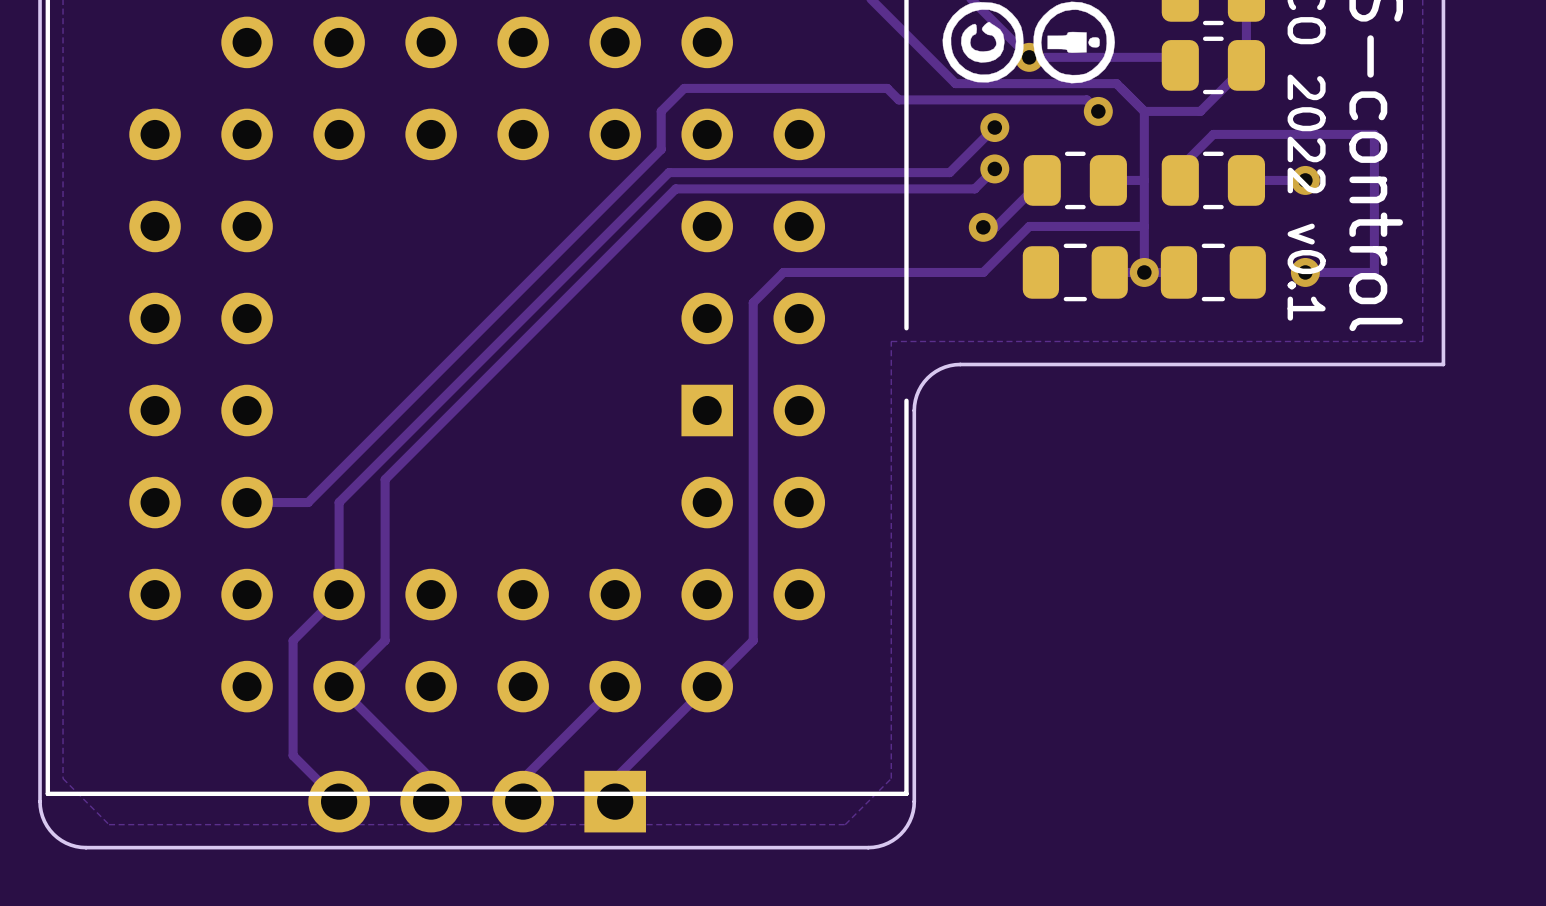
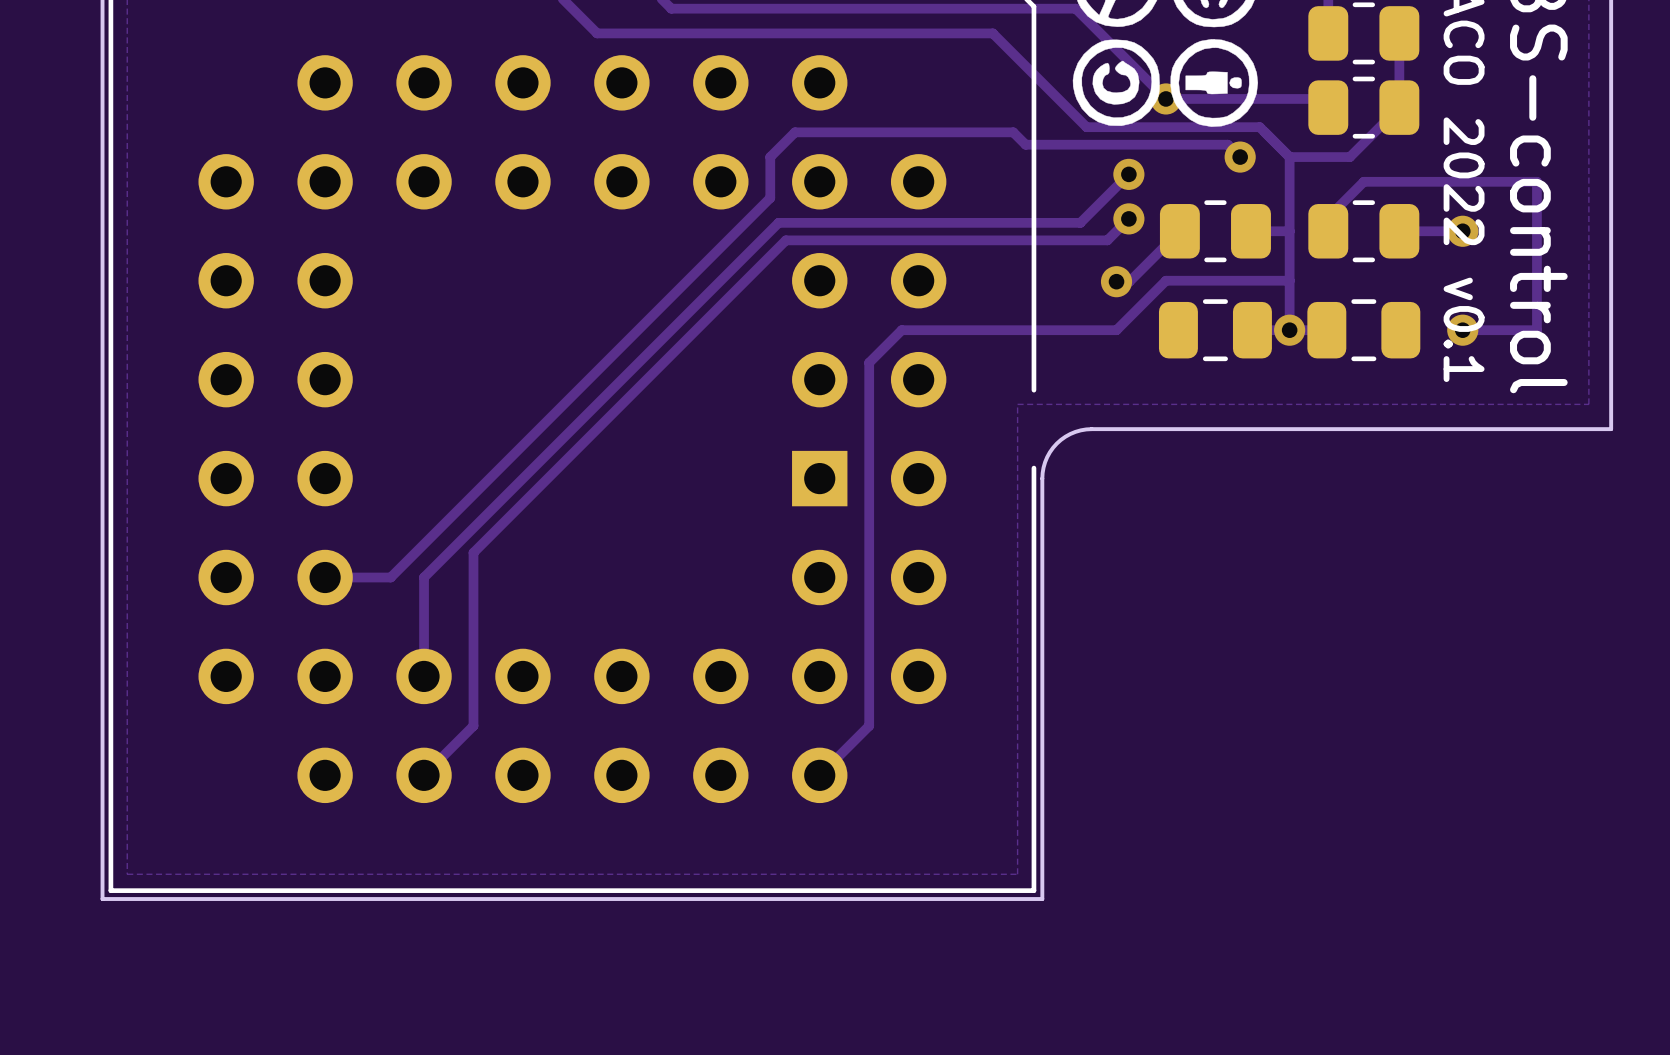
track: (339, 594) (293, 640) (293, 755) (339, 801) -> none
track: (339, 686) (431, 778) (431, 801) -> none
track: (615, 686) (523, 778) (523, 801) -> none
track: (707, 686) (615, 778) (615, 801) -> none
zone outline: (891, 778) (845, 824) (109, 824) (63, 778) -> (1017, 874) (127, 874)
part: (477, 801) -> none
board edge: (914, 801) (909, 821) (900, 834) (888, 843) (868, 847) (86, 847) (70, 845) (53, 834) (42, 816) (40, 801) -> (1042, 899) (102, 899)

